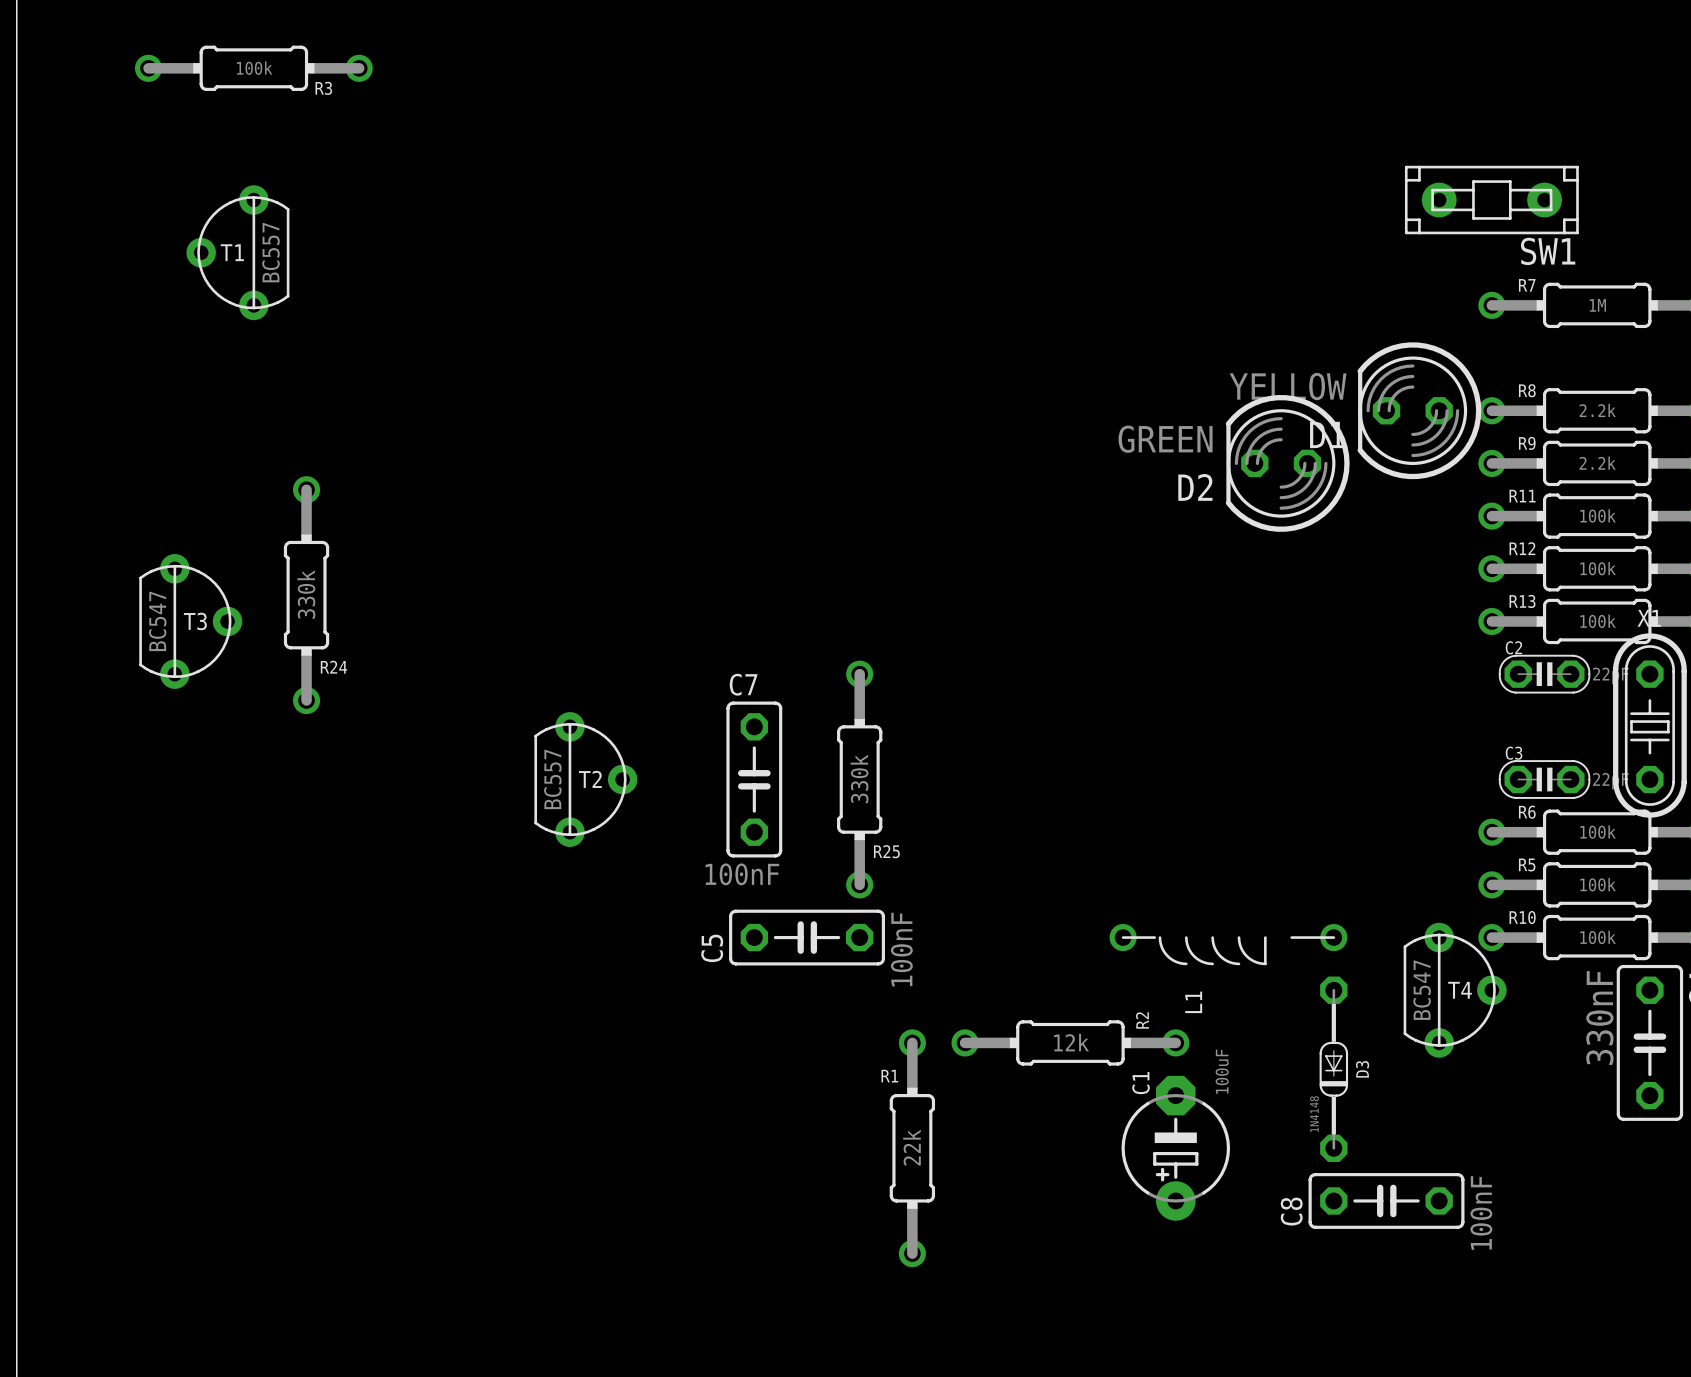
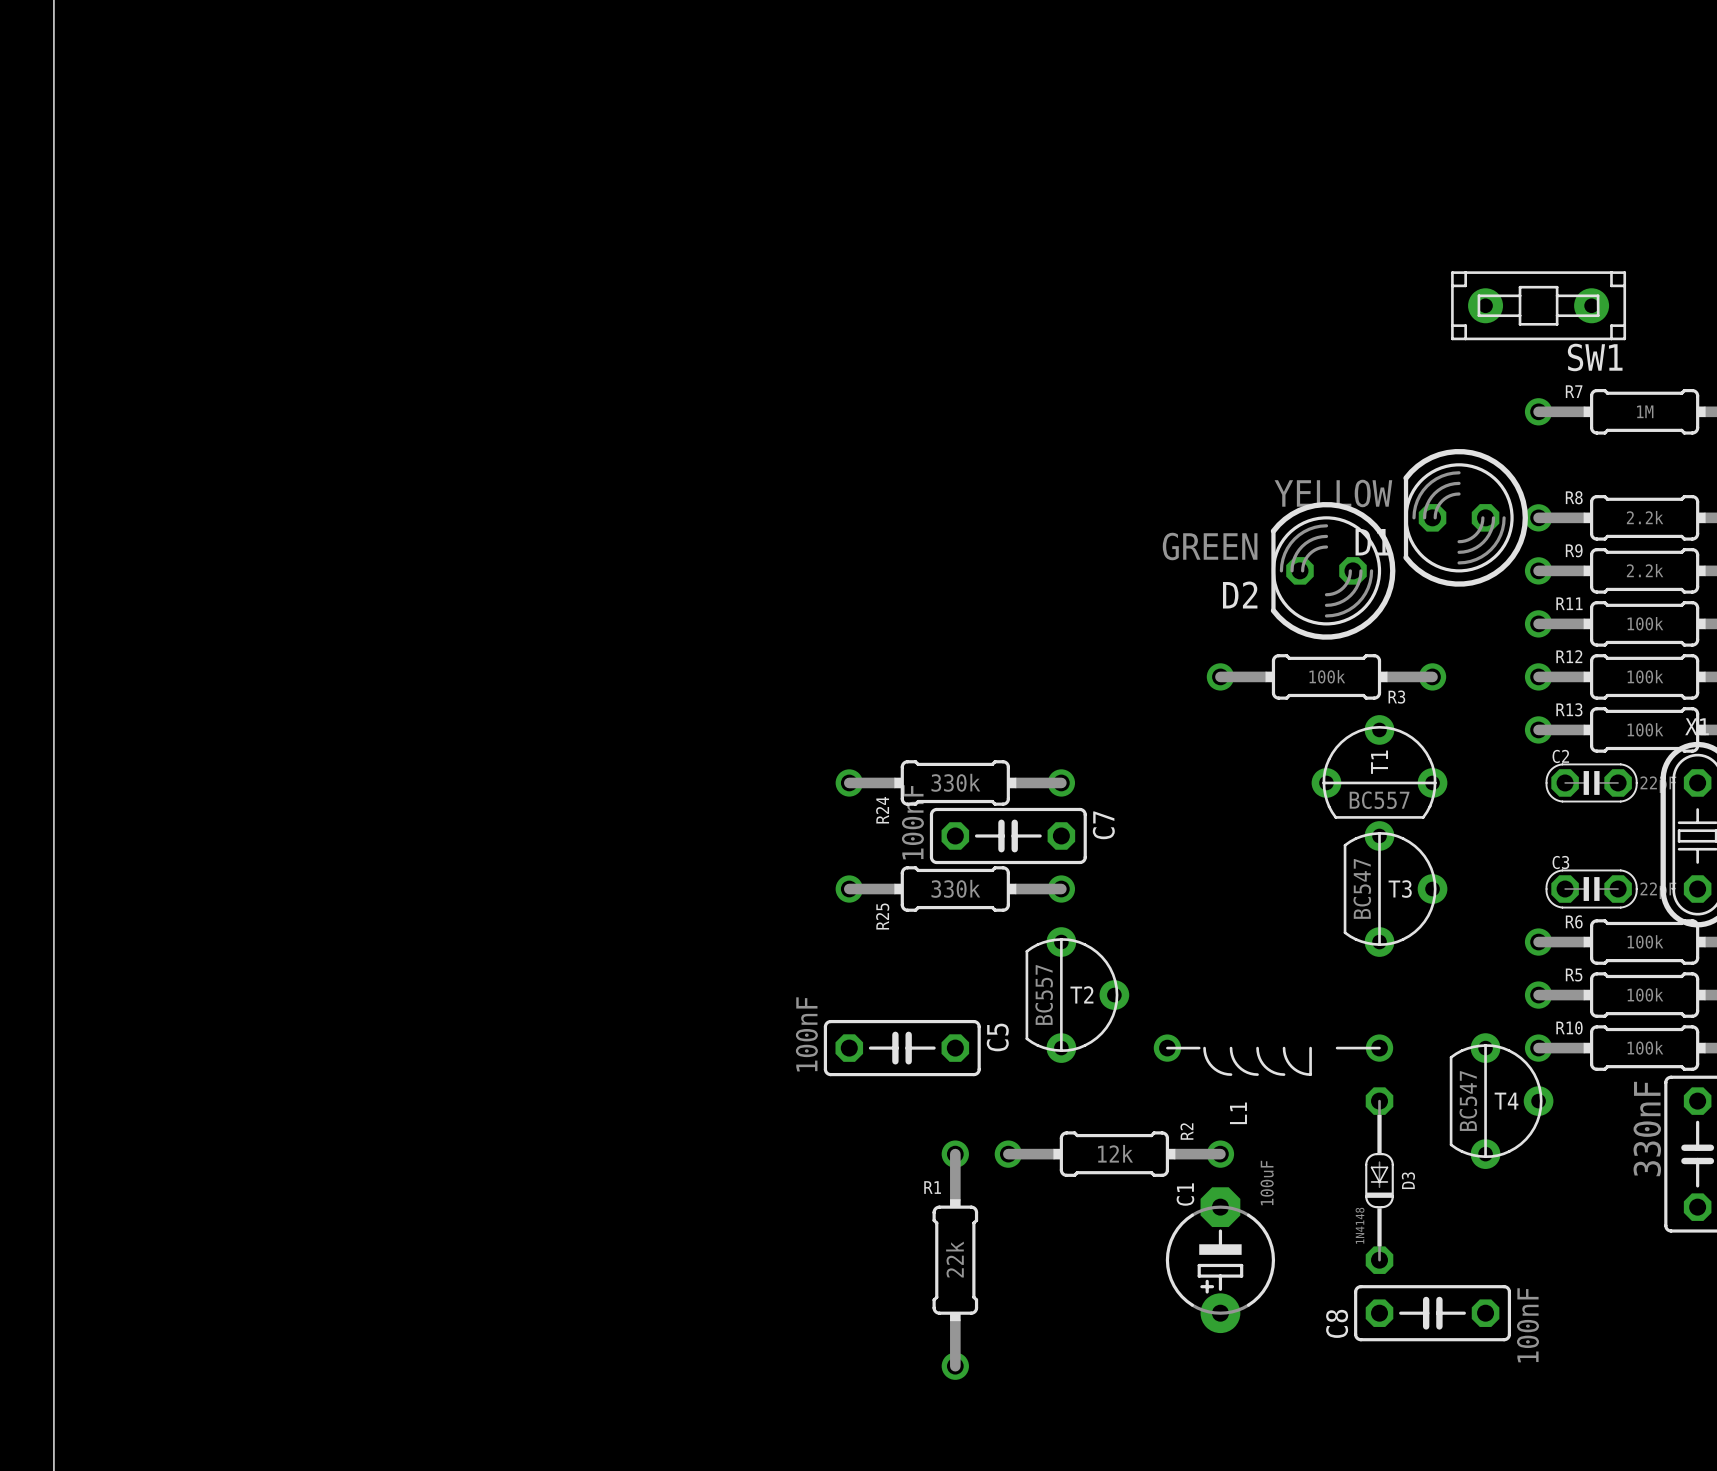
R3 position: (253, 68) -> (1326, 676)
T1 rotation: 0° (237, 252) -> 90° clockwise (1379, 766)
T1 position: (237, 252) -> (1379, 766)
R24 rotation: 0° (306, 595) -> 90° clockwise (955, 782)
R24 position: (306, 595) -> (955, 782)
T3 position: (190, 621) -> (1395, 889)
T2 position: (585, 779) -> (1077, 995)
C7 rotation: 0° (754, 779) -> 90° clockwise (1008, 835)
C7 position: (754, 779) -> (1008, 835)
R25 rotation: 0° (859, 779) -> 90° clockwise (955, 889)
C5 rotation: 0° (807, 937) -> 180° (902, 1048)

